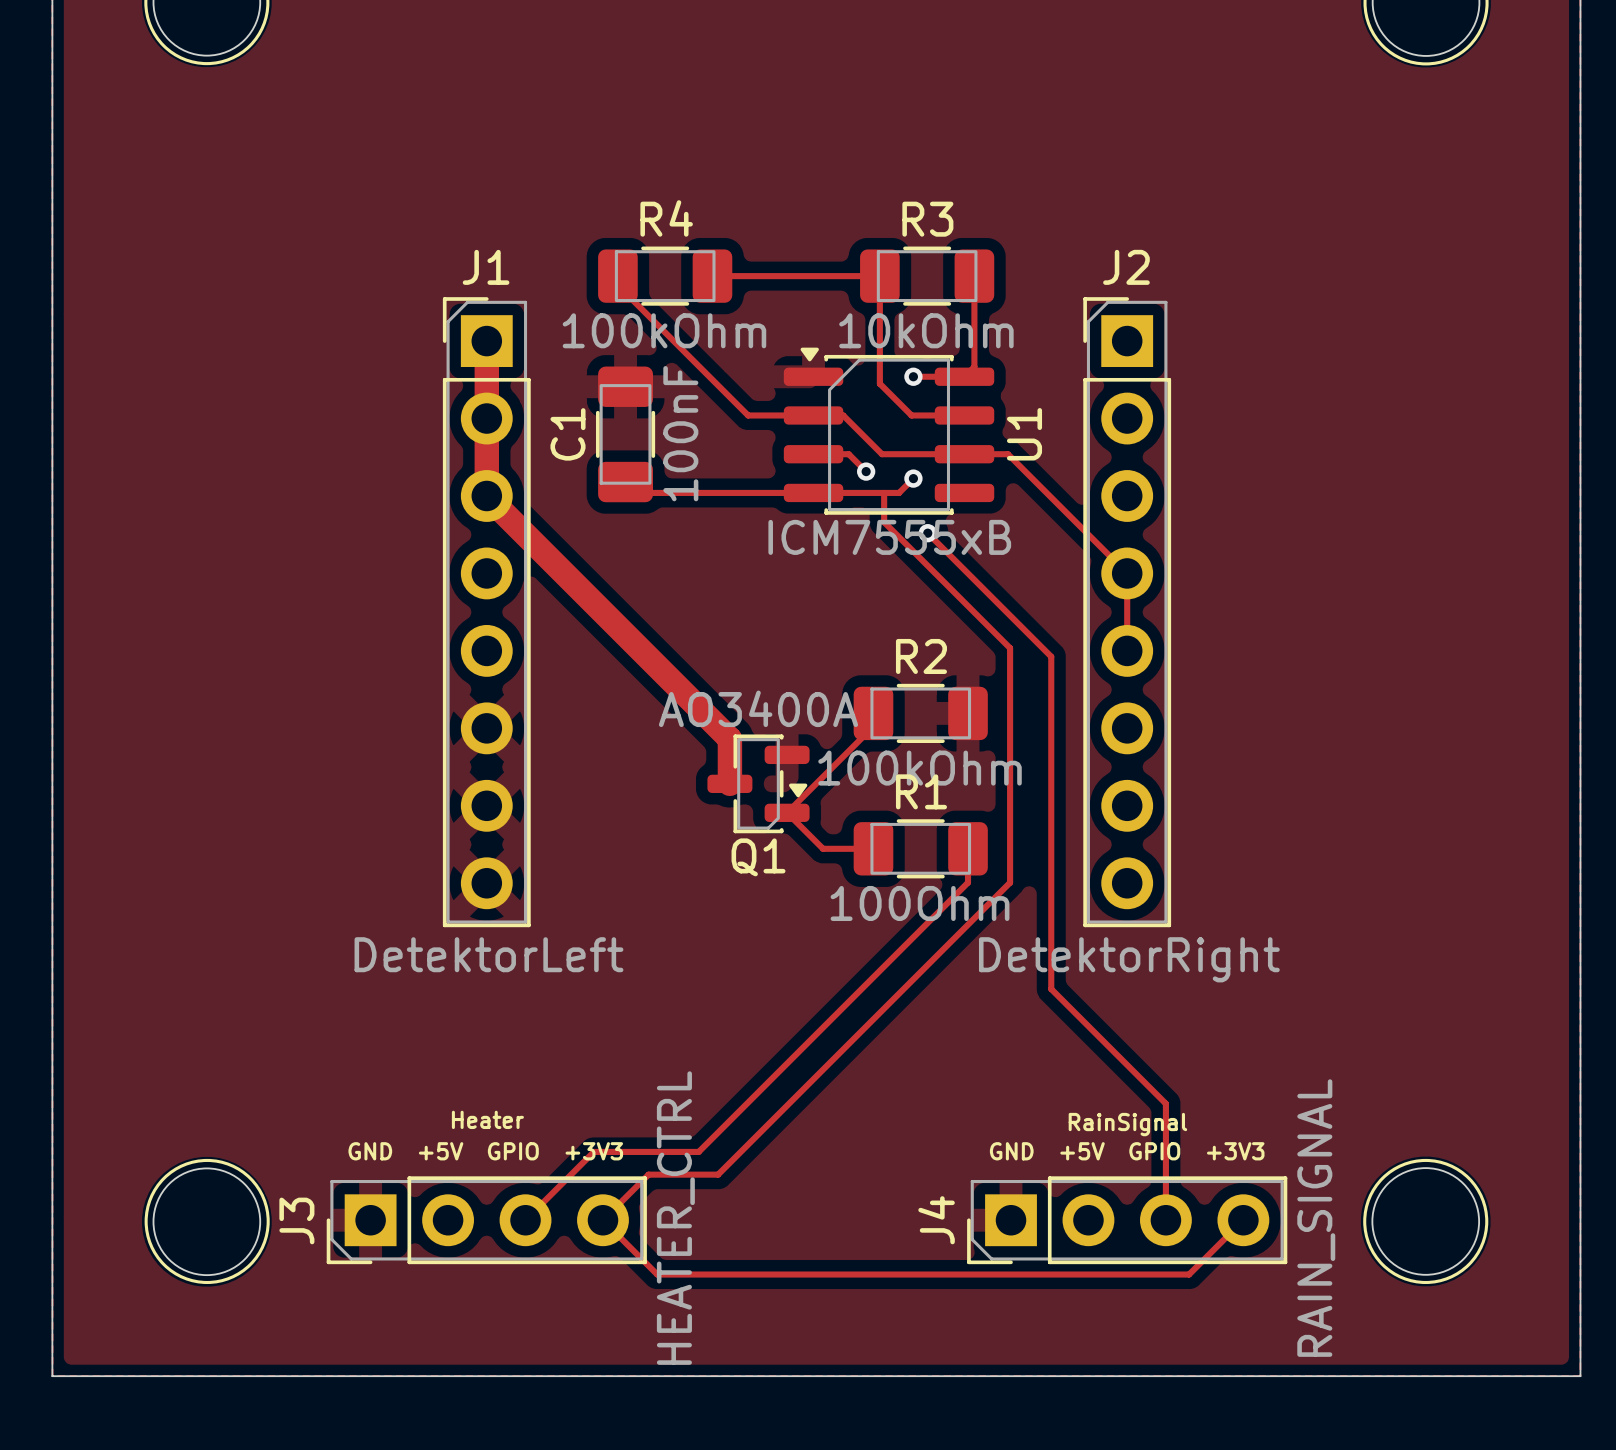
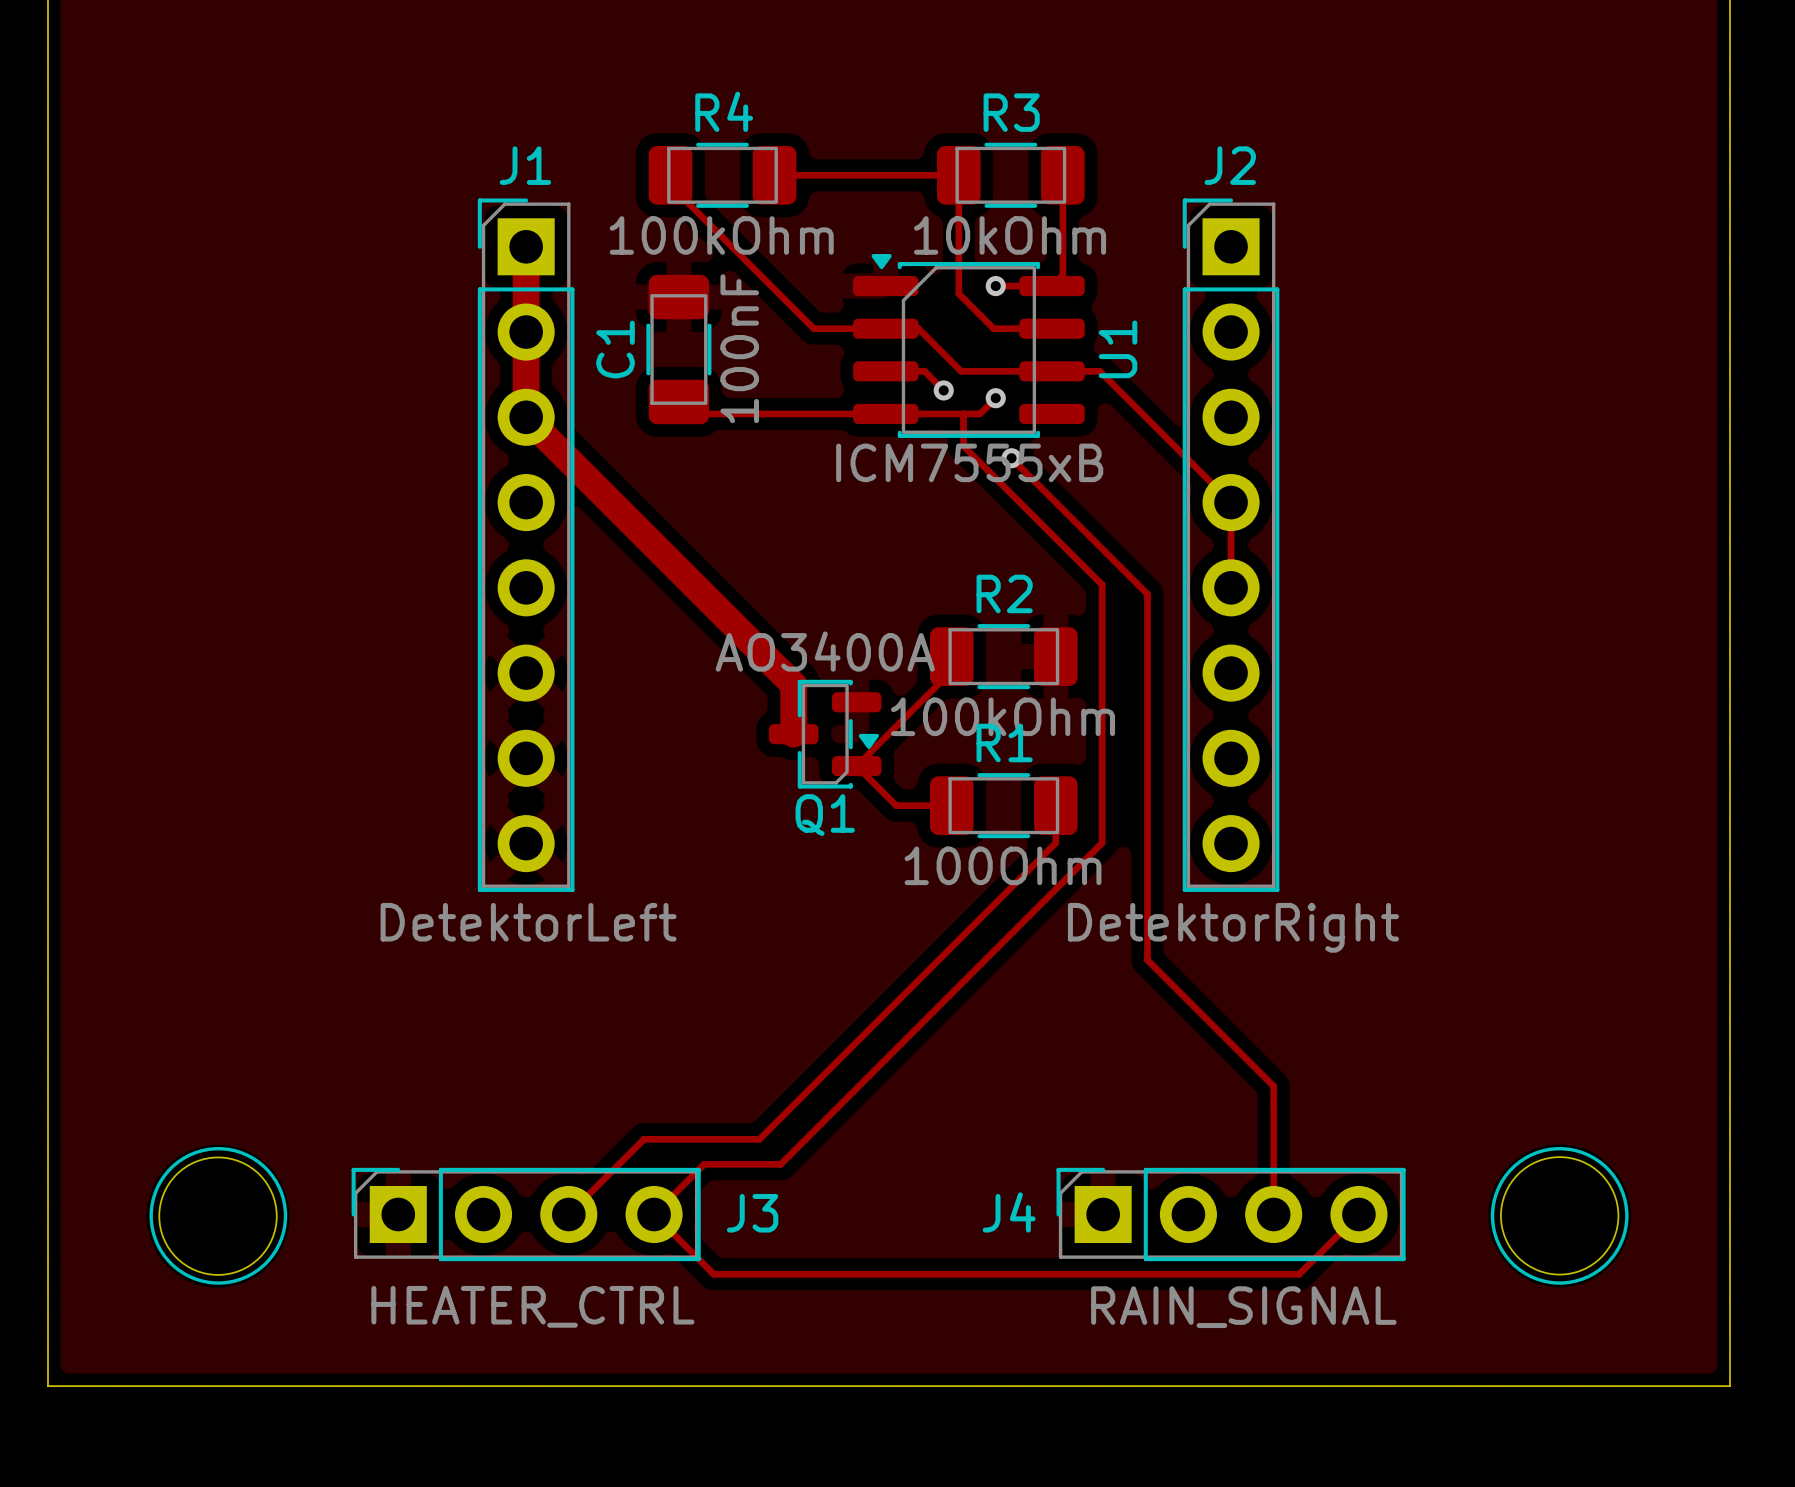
text: Heater (487, 1119) -> none
text: RainSignal (1127, 1124) -> none
text: GND +5V GPIO +3V3 (485, 1151) -> none
text: GND +5V GPIO +3V3 (1127, 1151) -> none
J3 footprint: [326, 1176, 647, 1265] -> [351, 1167, 701, 1262]
J4 footprint: [967, 1176, 1288, 1265] -> [1056, 1167, 1406, 1262]
J3 value position: HEATER_CTRL (675, 1218) -> HEATER_CTRL (532, 1306)
J4 value position: RAIN_SIGNAL (1316, 1218) -> RAIN_SIGNAL (1243, 1307)
J3 name position: J3 (296, 1220) -> J3 (752, 1213)

